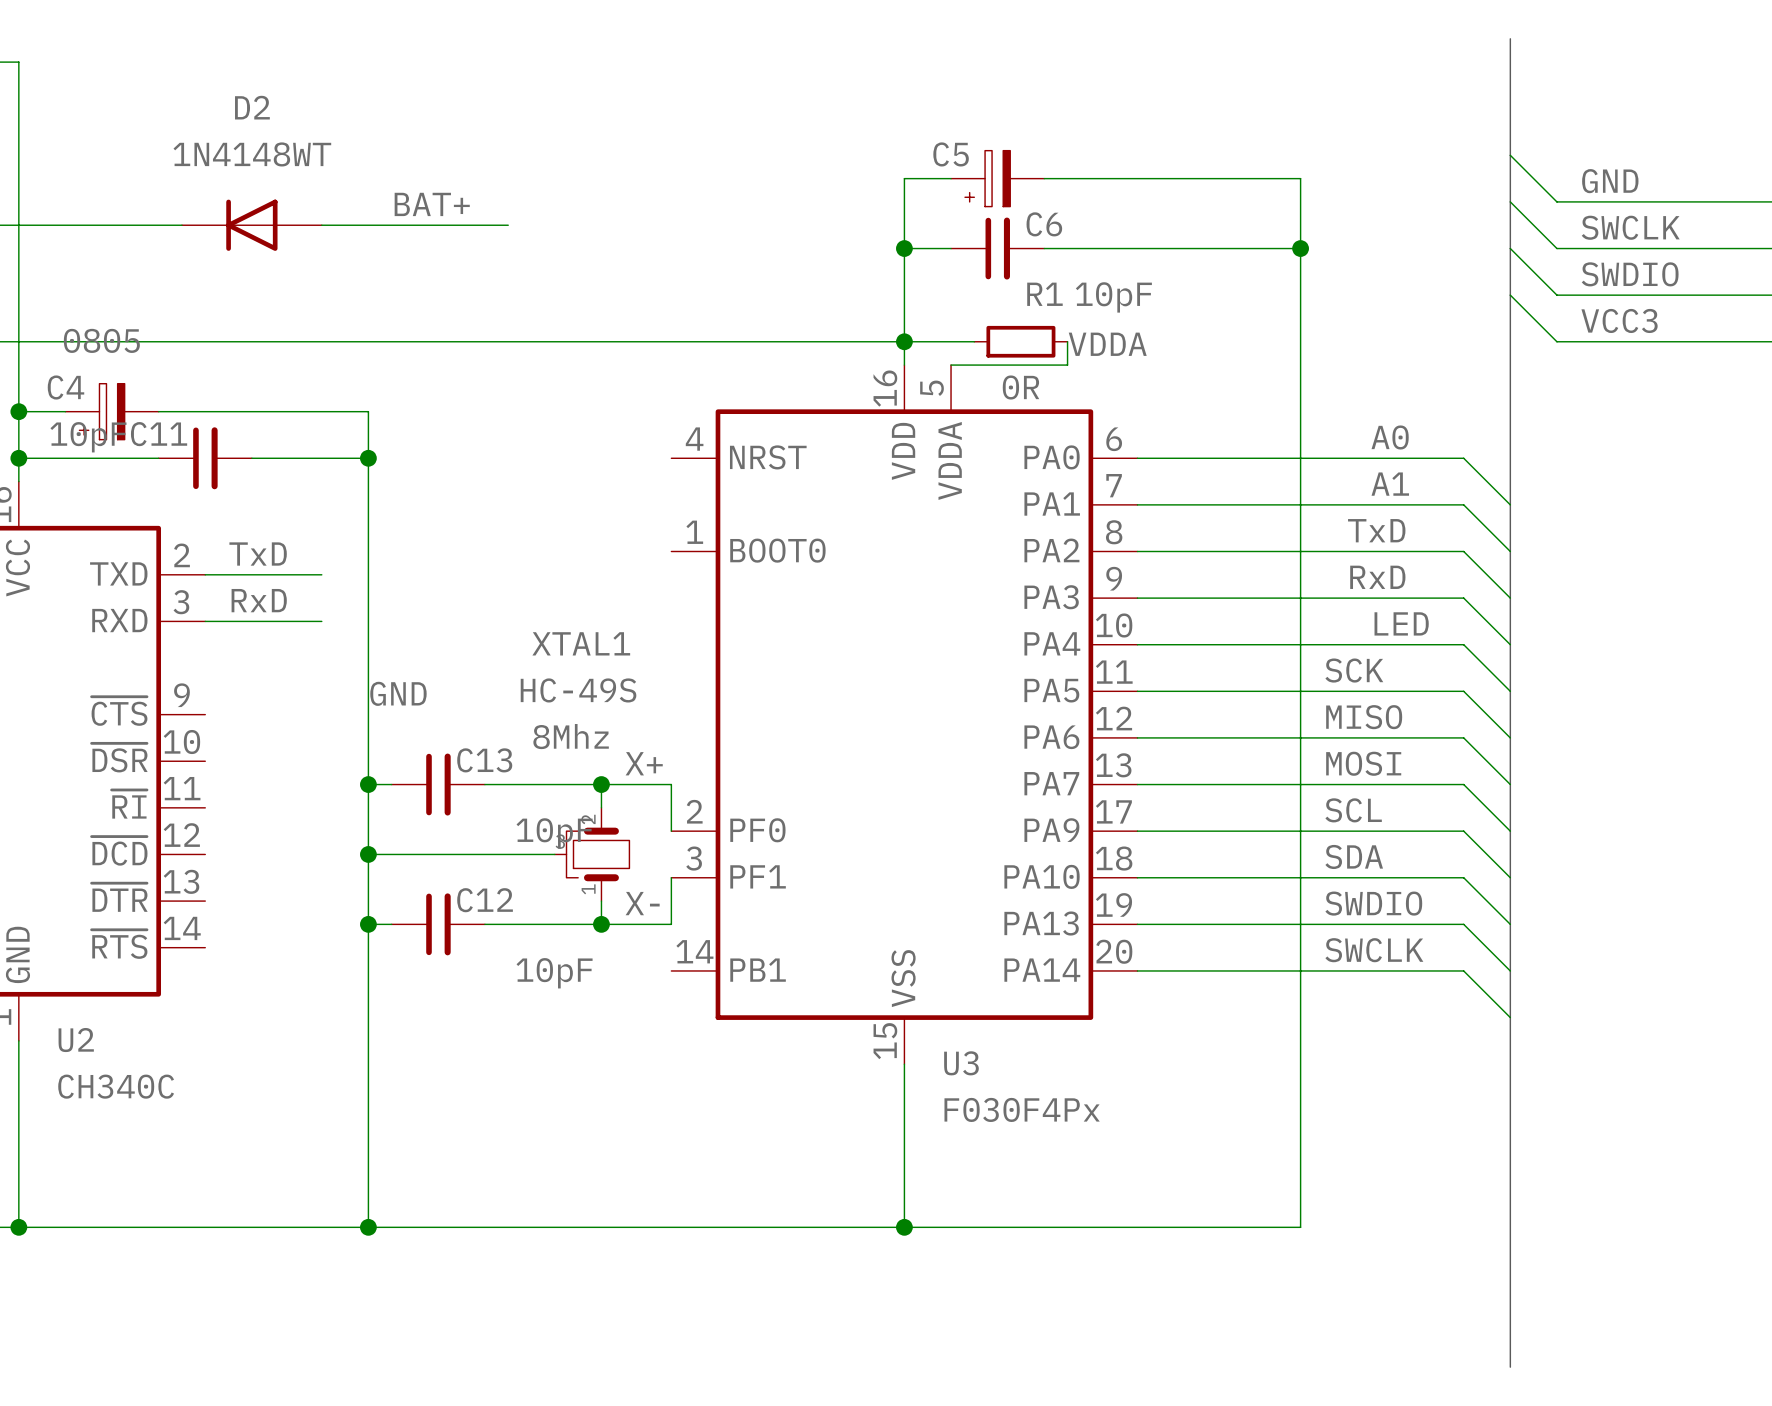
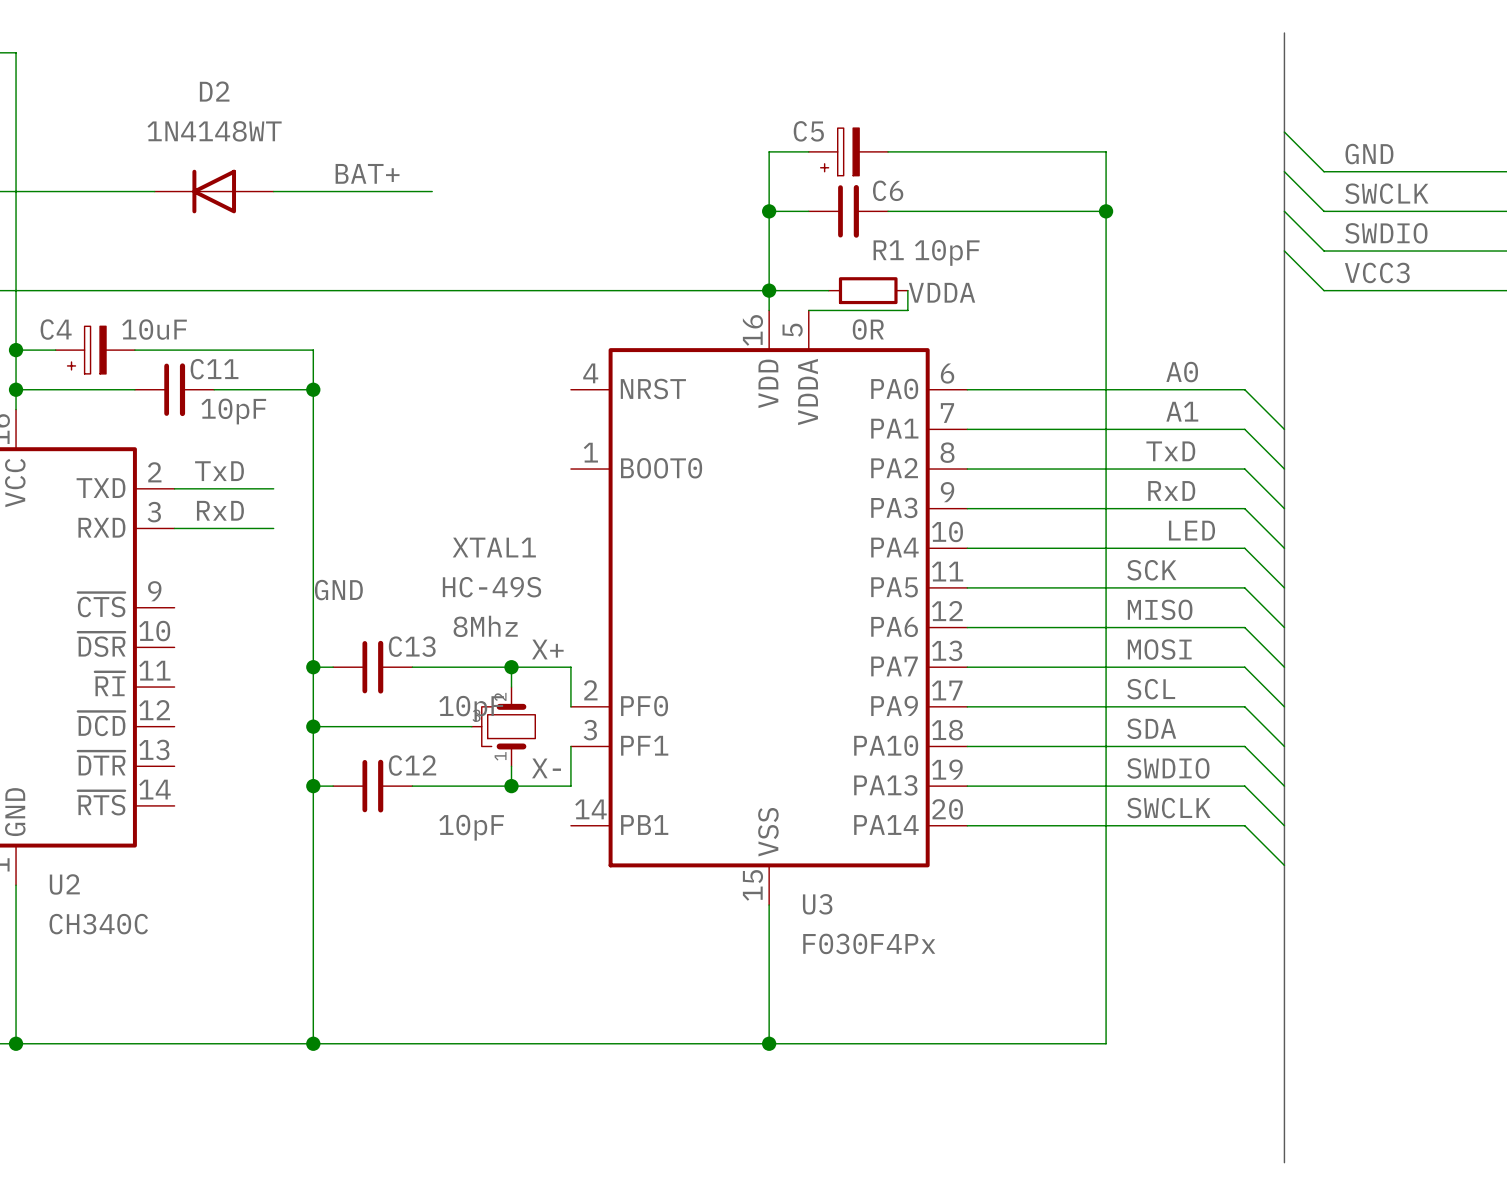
C4 value: 0805 (101, 340) -> 10uF (154, 329)
C11 name position: C11 (159, 434) -> C11 (214, 369)
C11 value position: 10pF (88, 437) -> 10pF (233, 411)

